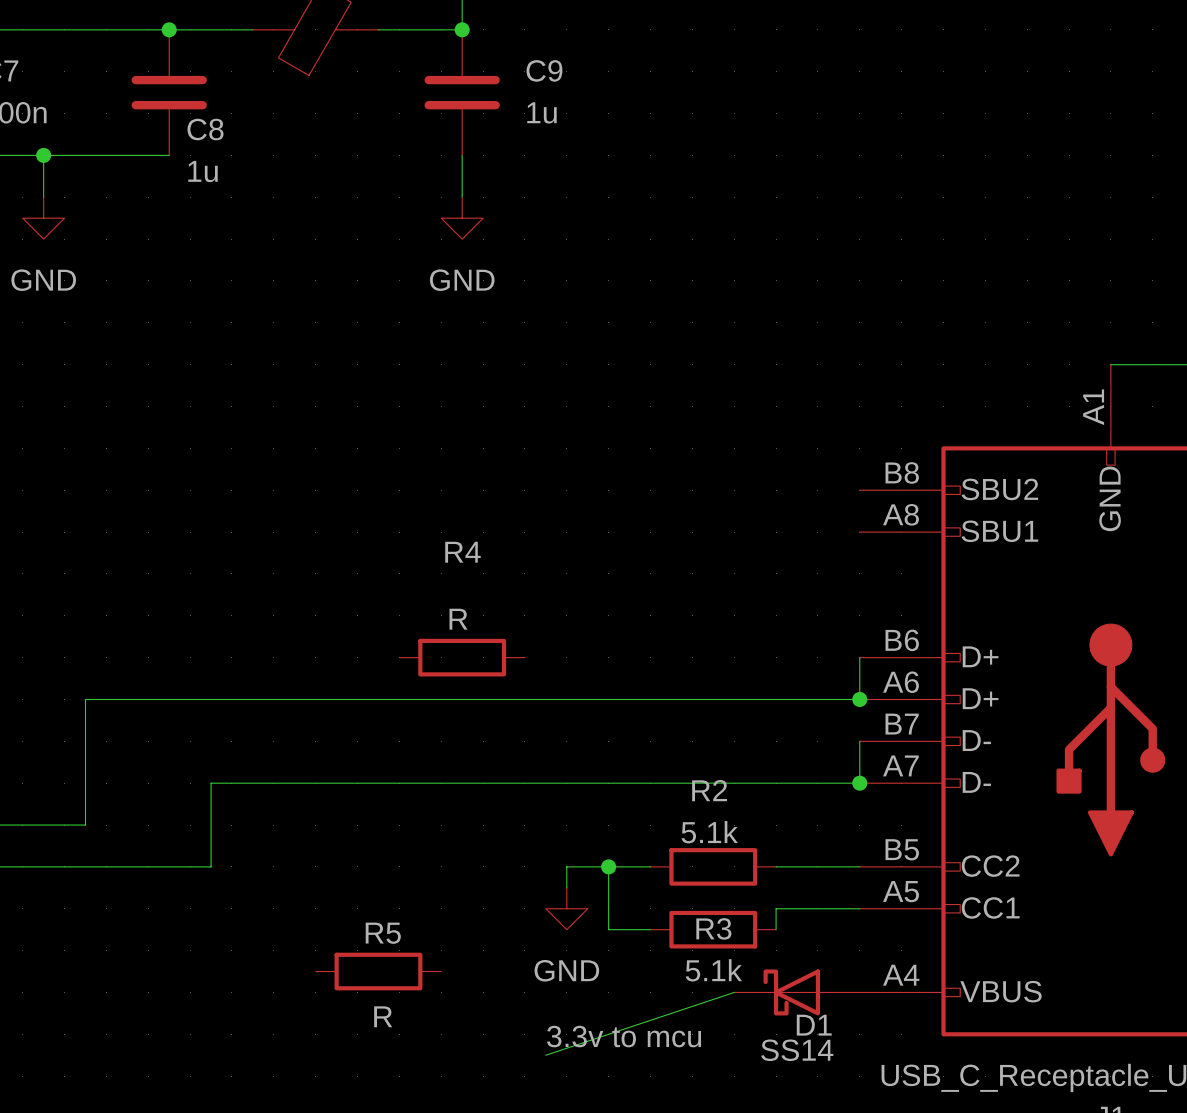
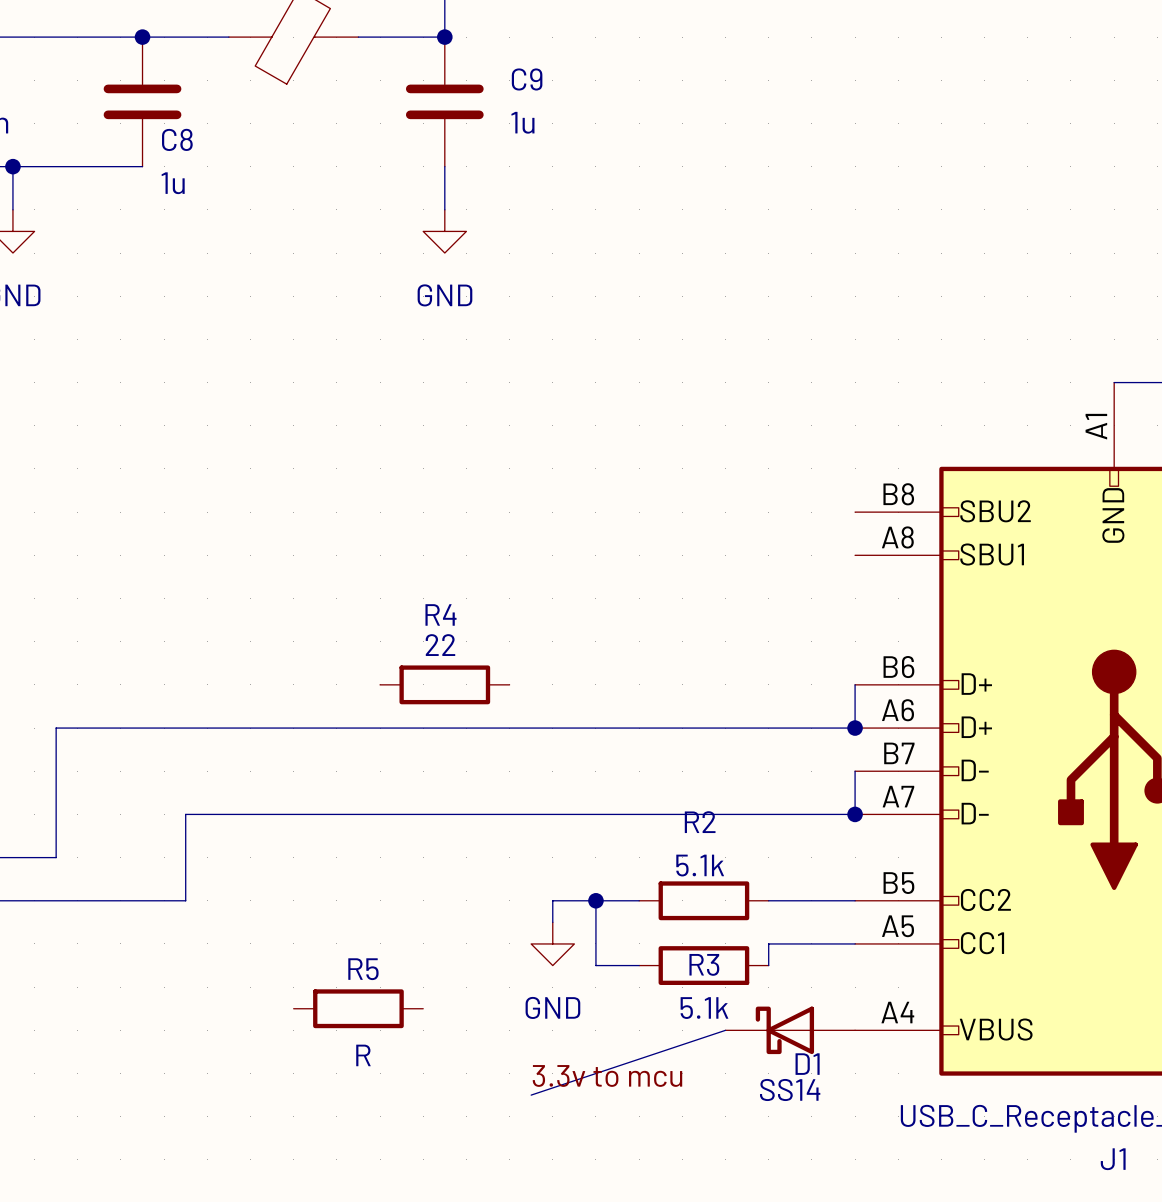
R4 name position: R4 (462, 552) -> R4 (441, 614)
R4 value: R (458, 619) -> 22 (440, 645)

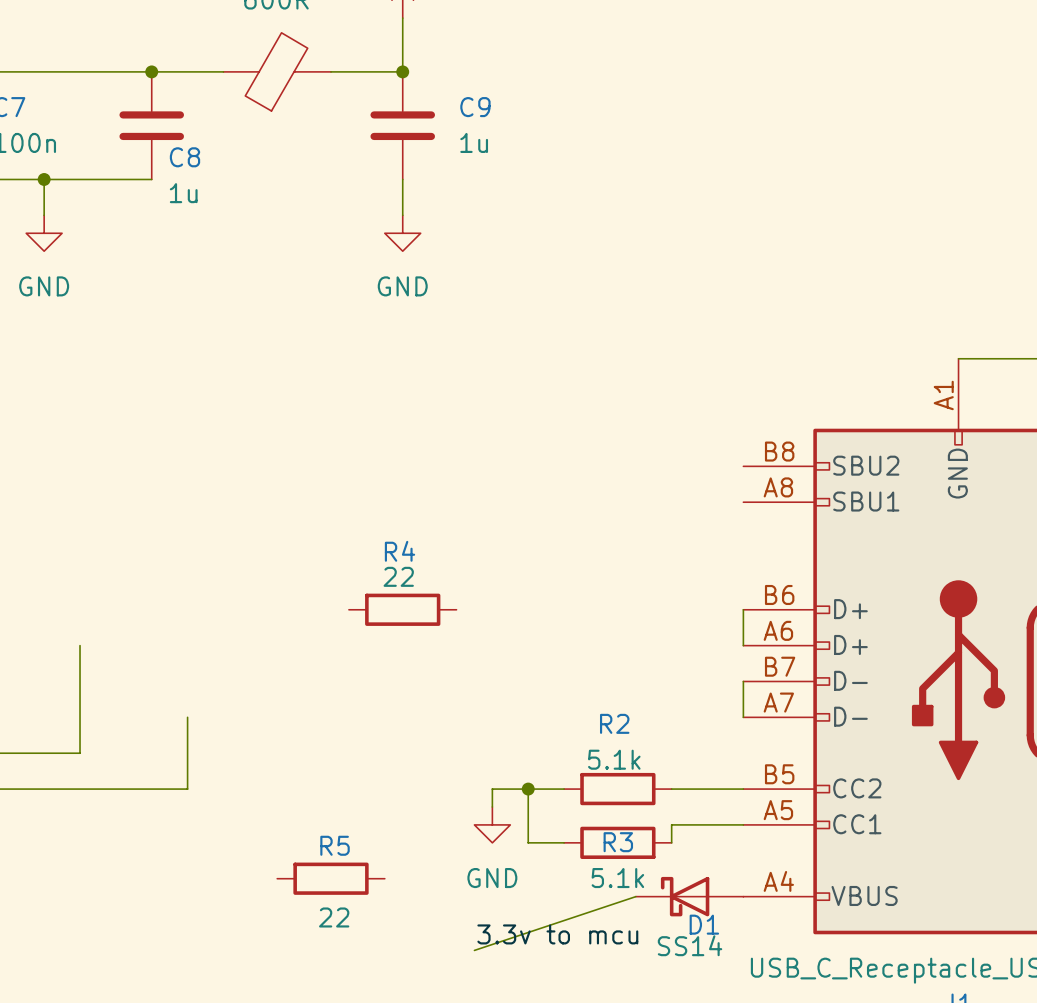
wire: (56, 728) (855, 728) -> none
junction: (855, 728) -> none
wire: (185, 814) (855, 814) -> none
junction: (855, 814) -> none
R5 value: R (363, 1055) -> 22 (334, 917)

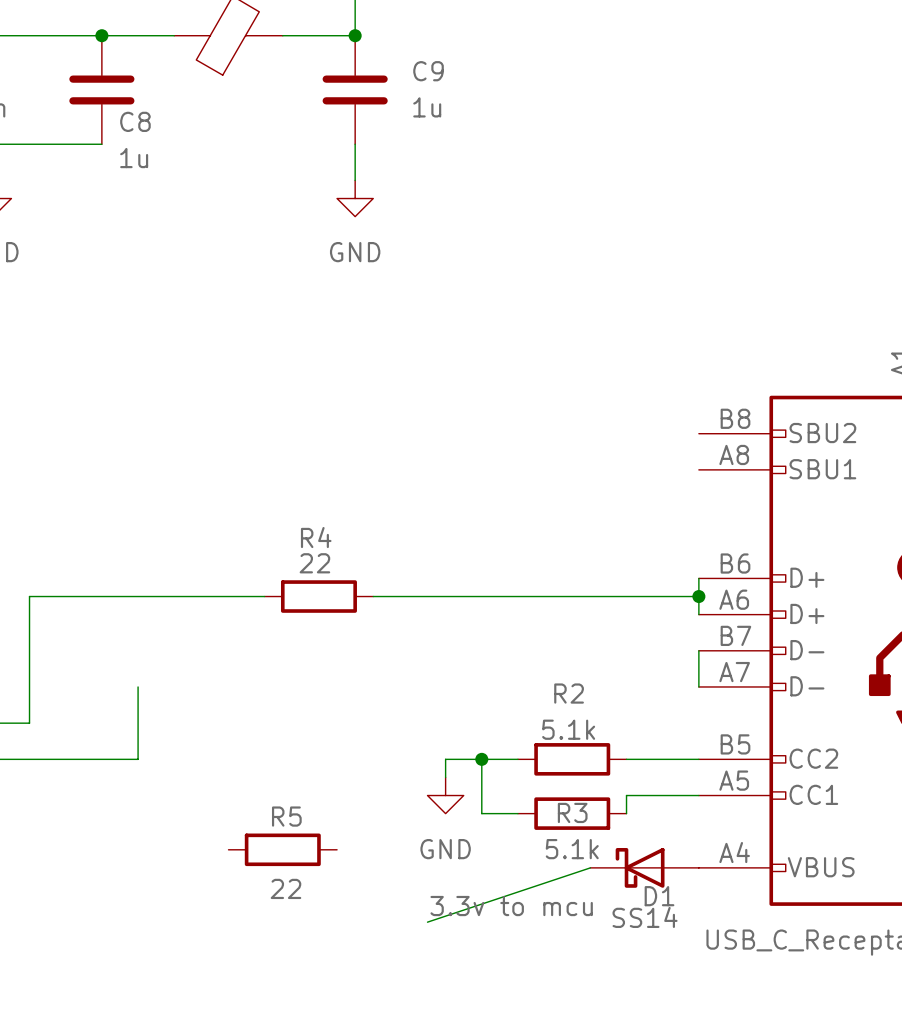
R4 position: (402, 609) -> (318, 596)
wire: none -> (264, 596) (29, 596) (29, 614)
wire: none -> (373, 596) (698, 596)
junction: none -> (698, 596)

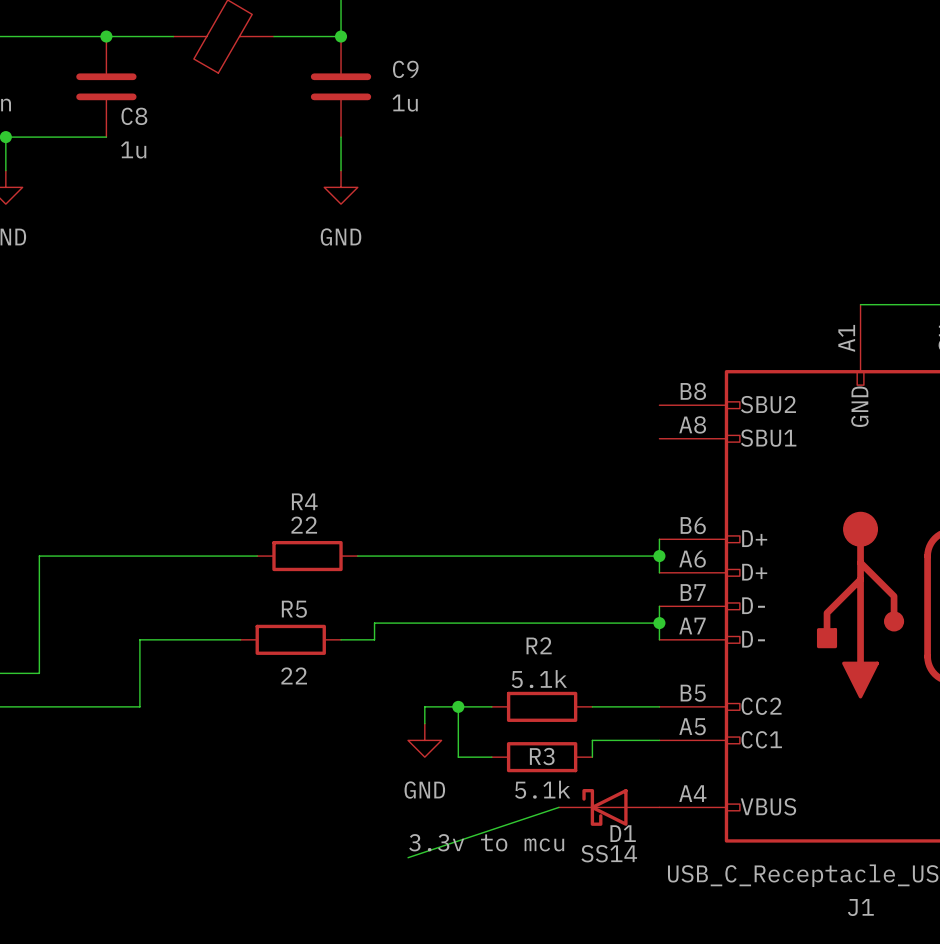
wire: none -> (659, 623) (374, 623) (374, 639) (341, 639)
junction: none -> (659, 623)
wire: none -> (139, 639) (240, 639)
R5 position: (282, 849) -> (290, 639)

